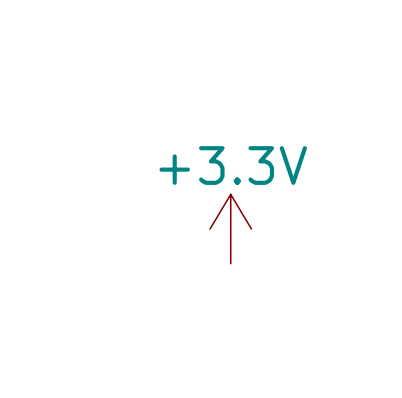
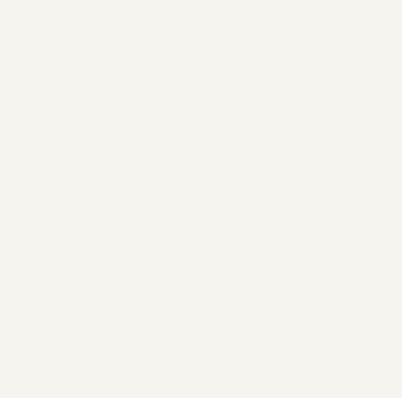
power symbol: +3.3V (230, 229) -> none

